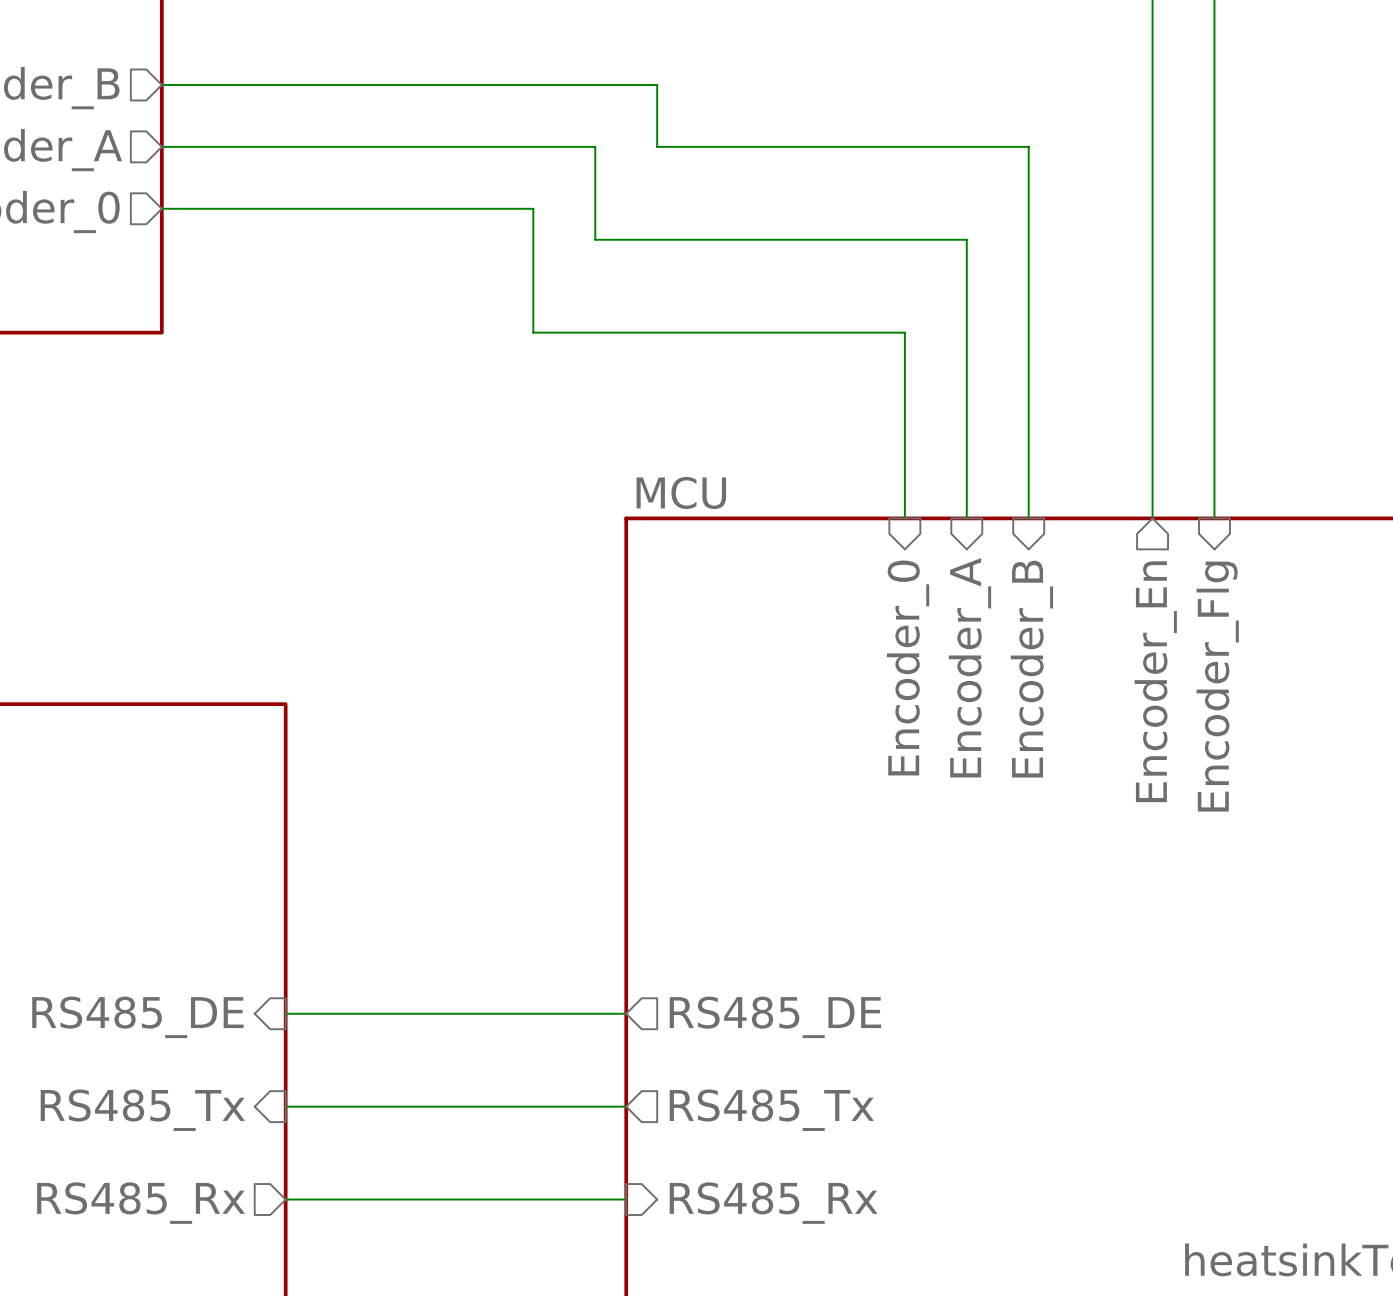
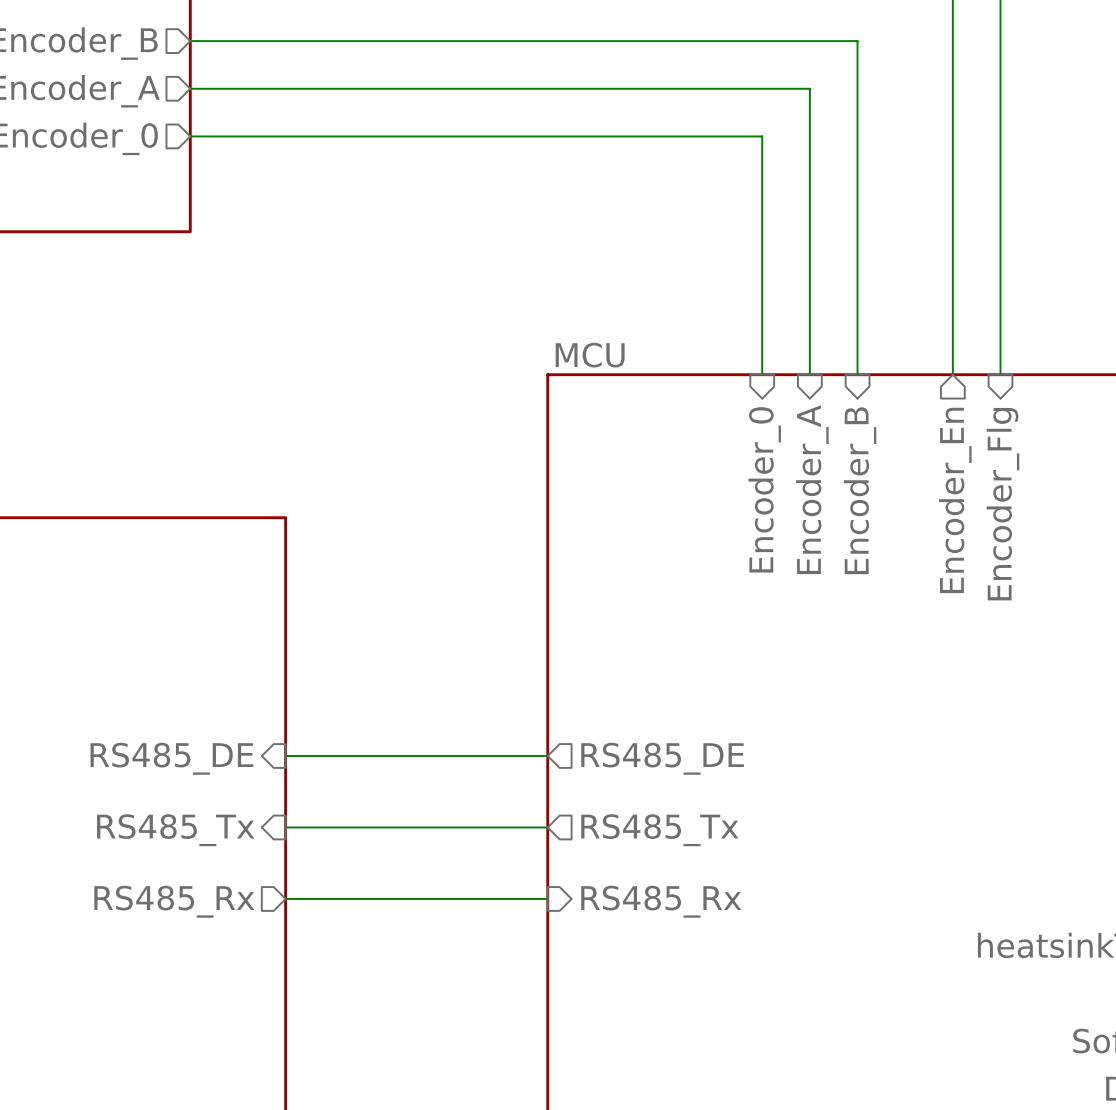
wire: (657, 84) (657, 146) -> (523, 88) (571, 88)
wire: none -> (571, 41) (857, 41) (857, 88)
wire: (595, 146) (595, 239) (966, 239) -> none
wire: (966, 146) (1028, 146) -> (809, 88) (809, 160)
wire: (533, 208) (533, 332) (904, 332) -> (476, 136) (762, 136) (762, 231)

